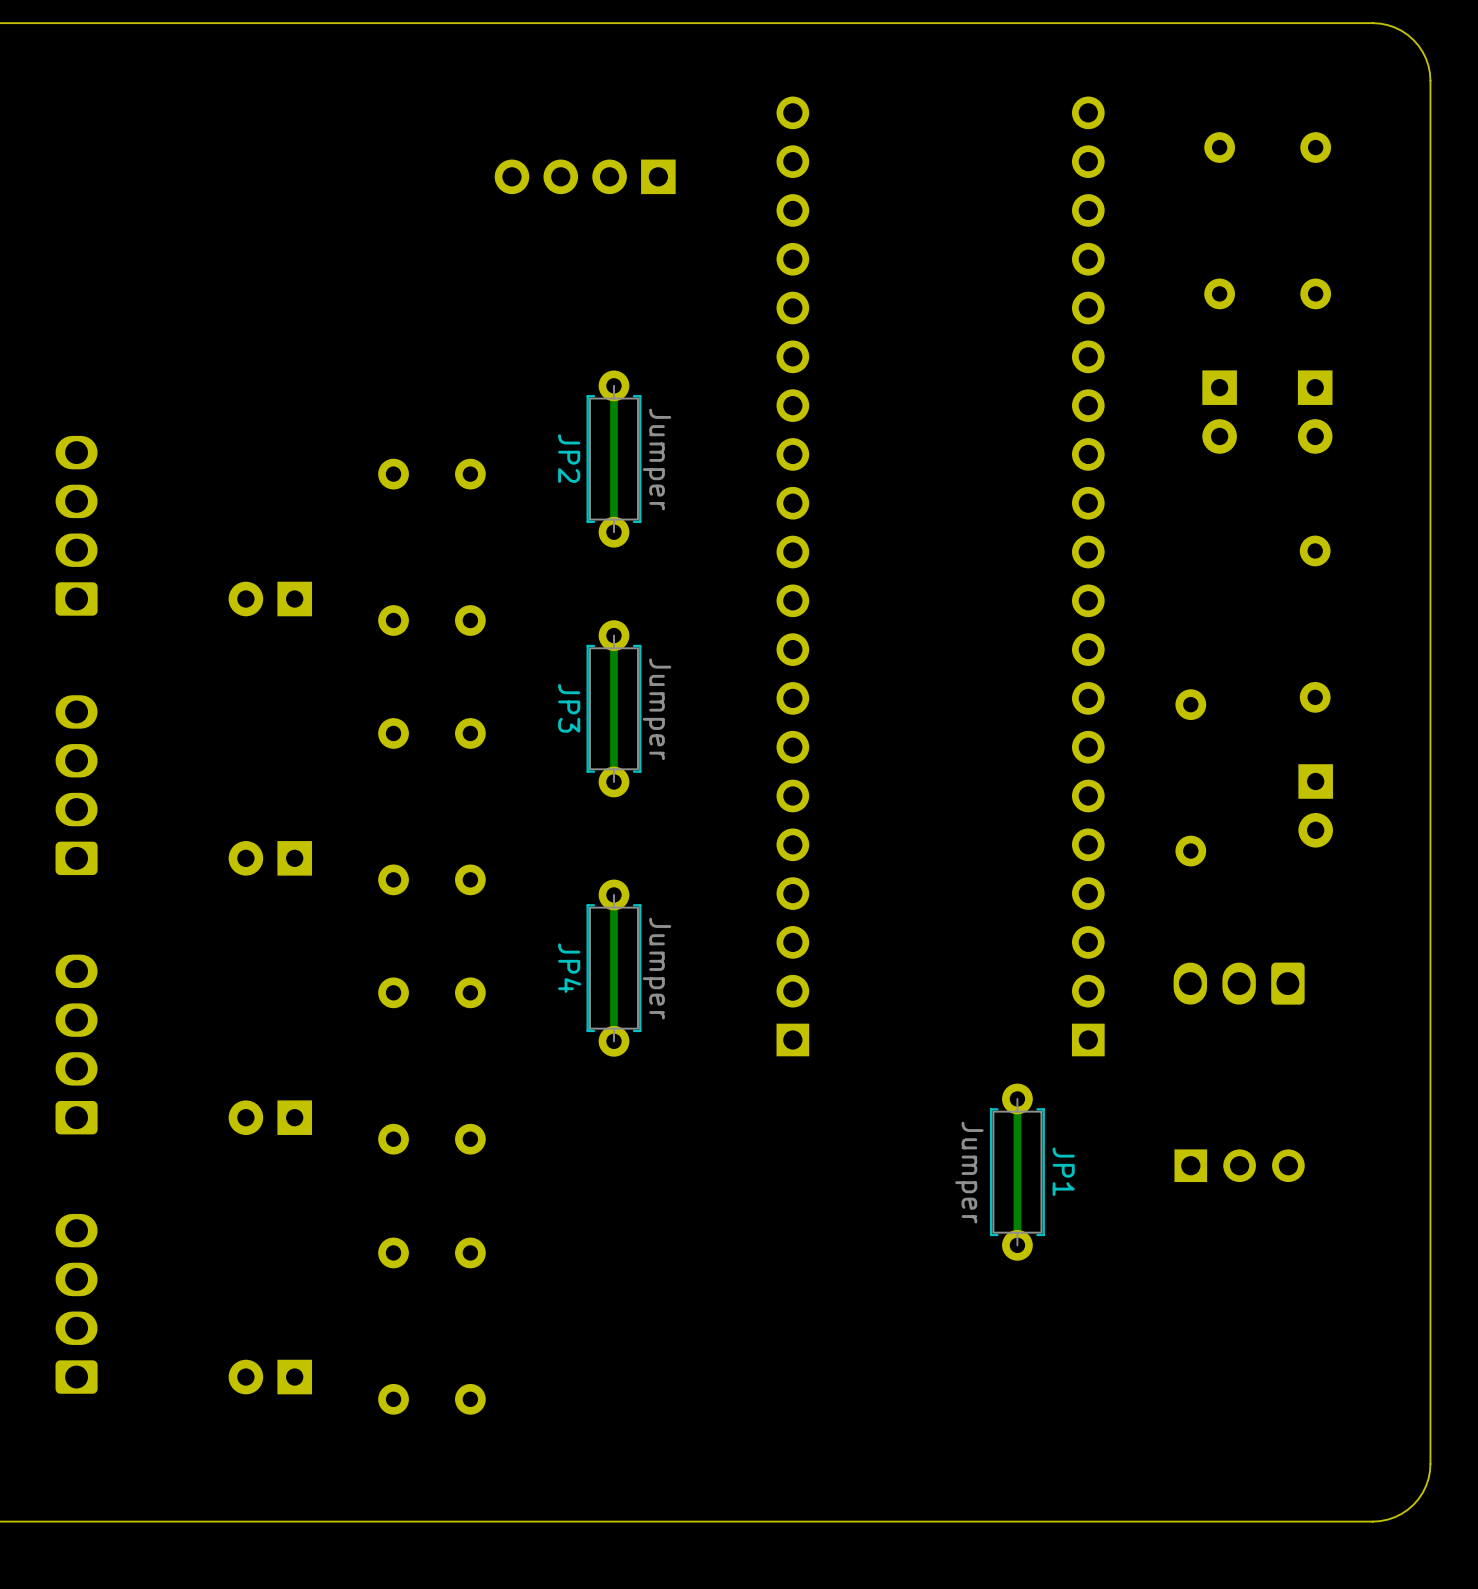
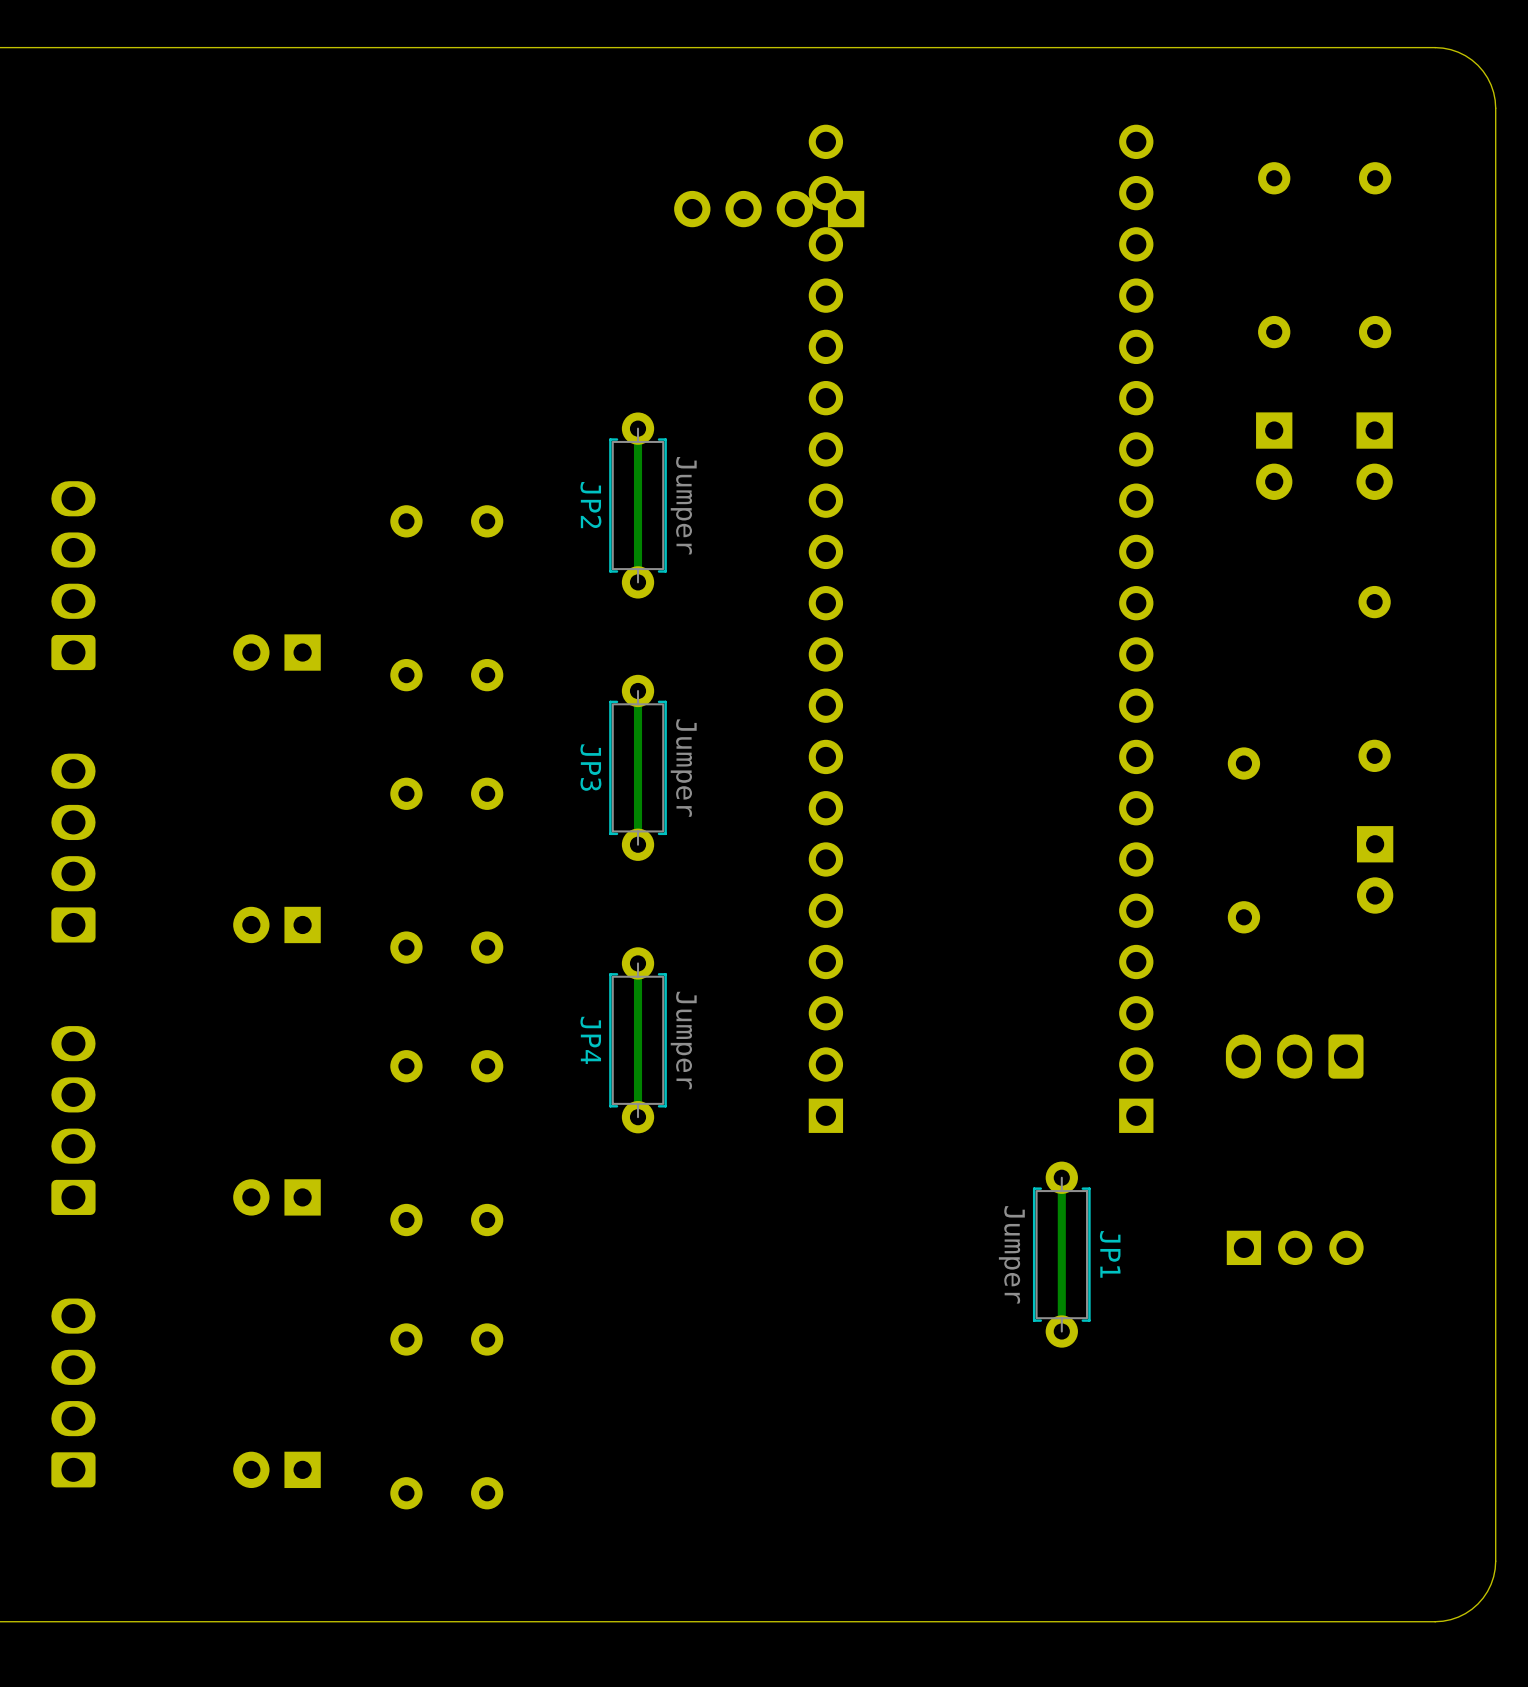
part position: (585, 176) -> (769, 209)

